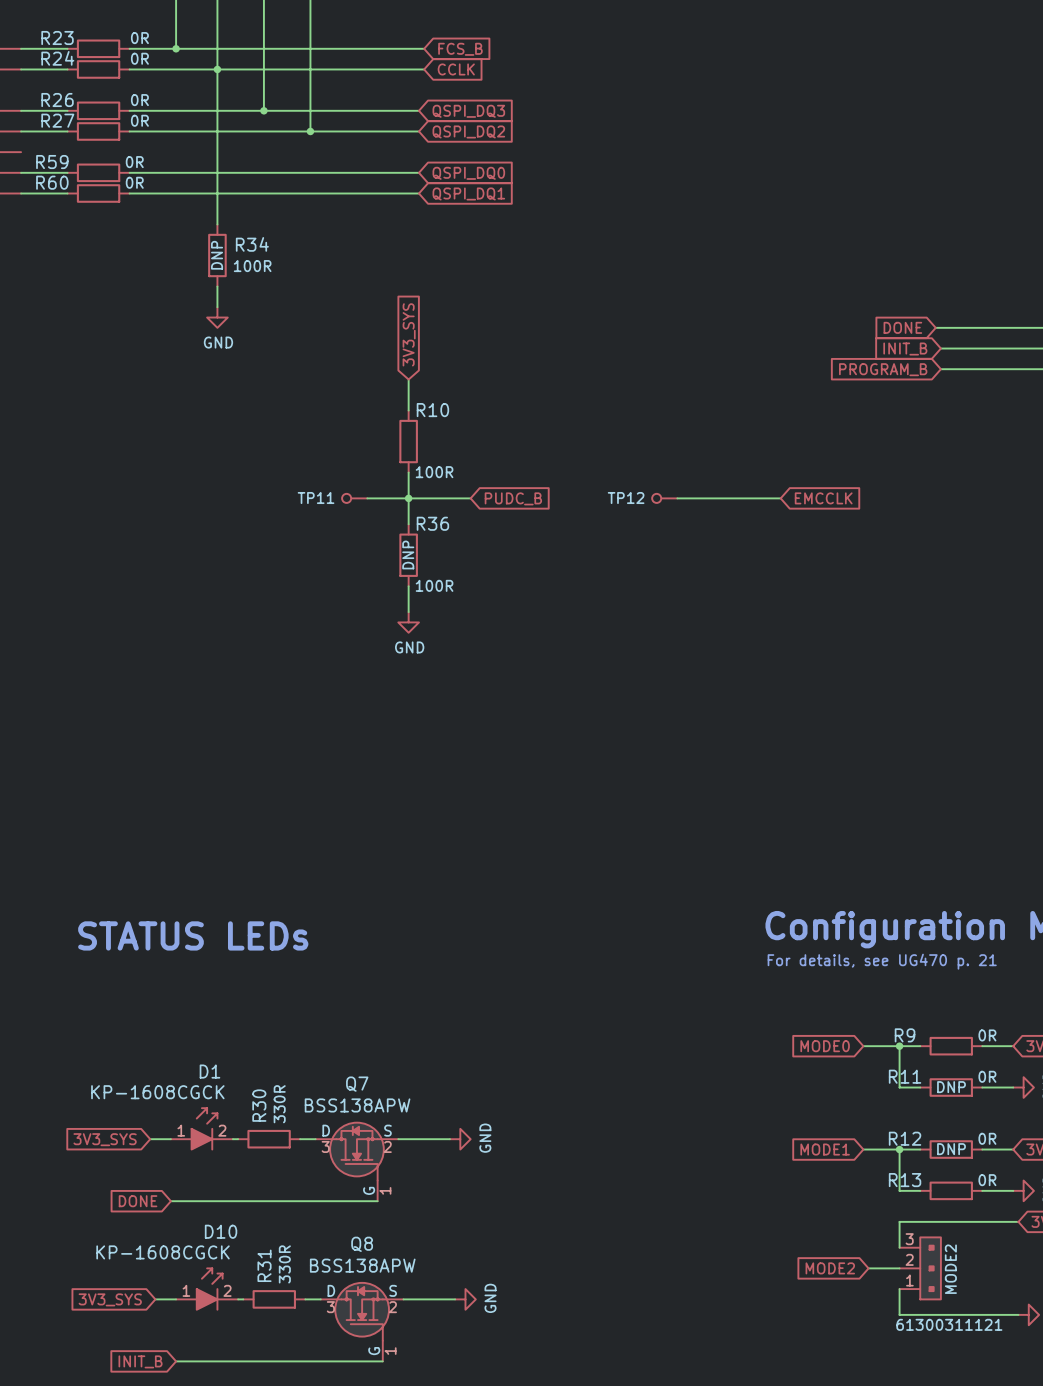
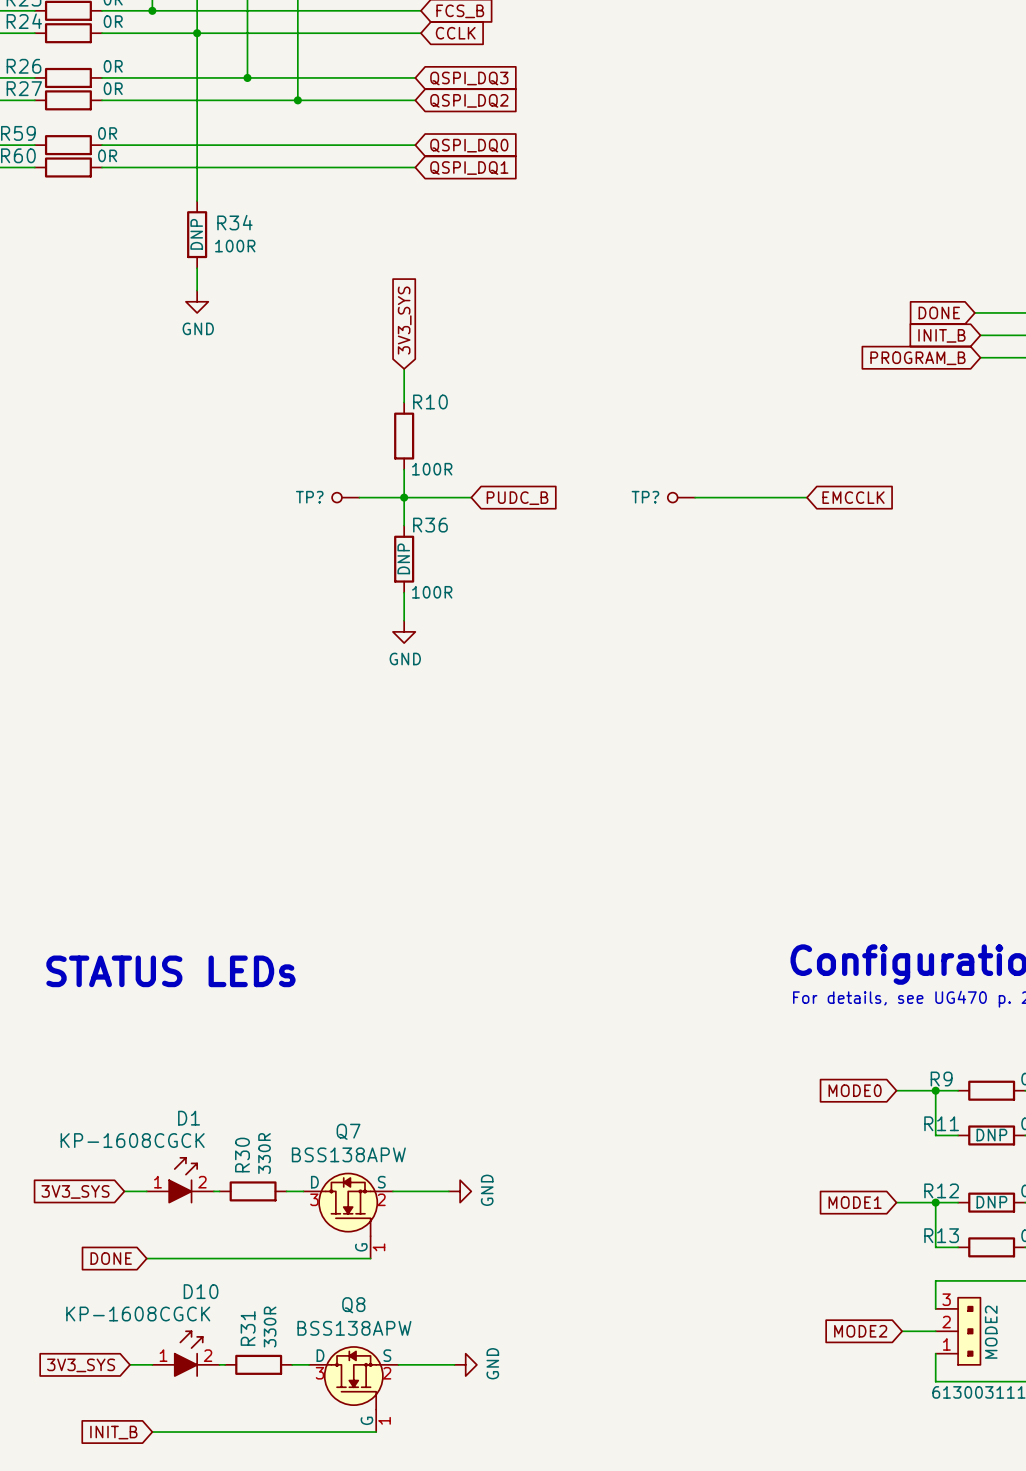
TP11 name: TP11 (316, 498) -> TP? (309, 497)
TP12 name: TP12 (626, 498) -> TP? (645, 497)

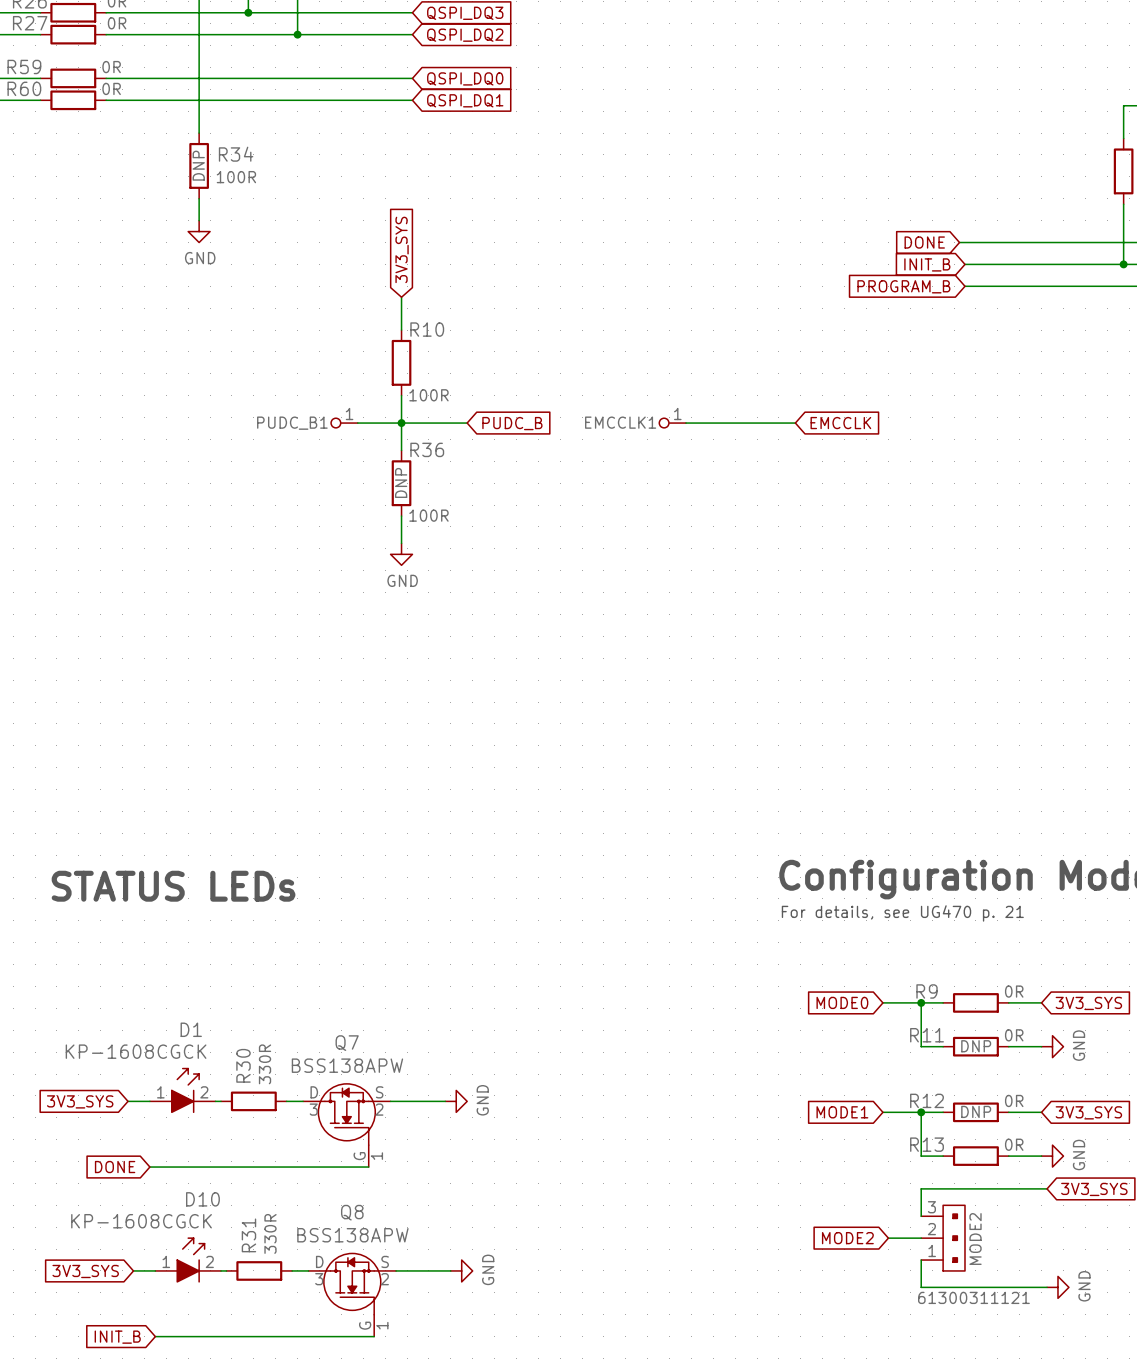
TP? pin number: none -> 1 (349, 414)
TP? pin number: none -> 1 (677, 414)
TP? name: TP? (309, 497) -> PUDC_B1 (292, 423)
TP? name: TP? (645, 497) -> EMCCLK1 (620, 422)

